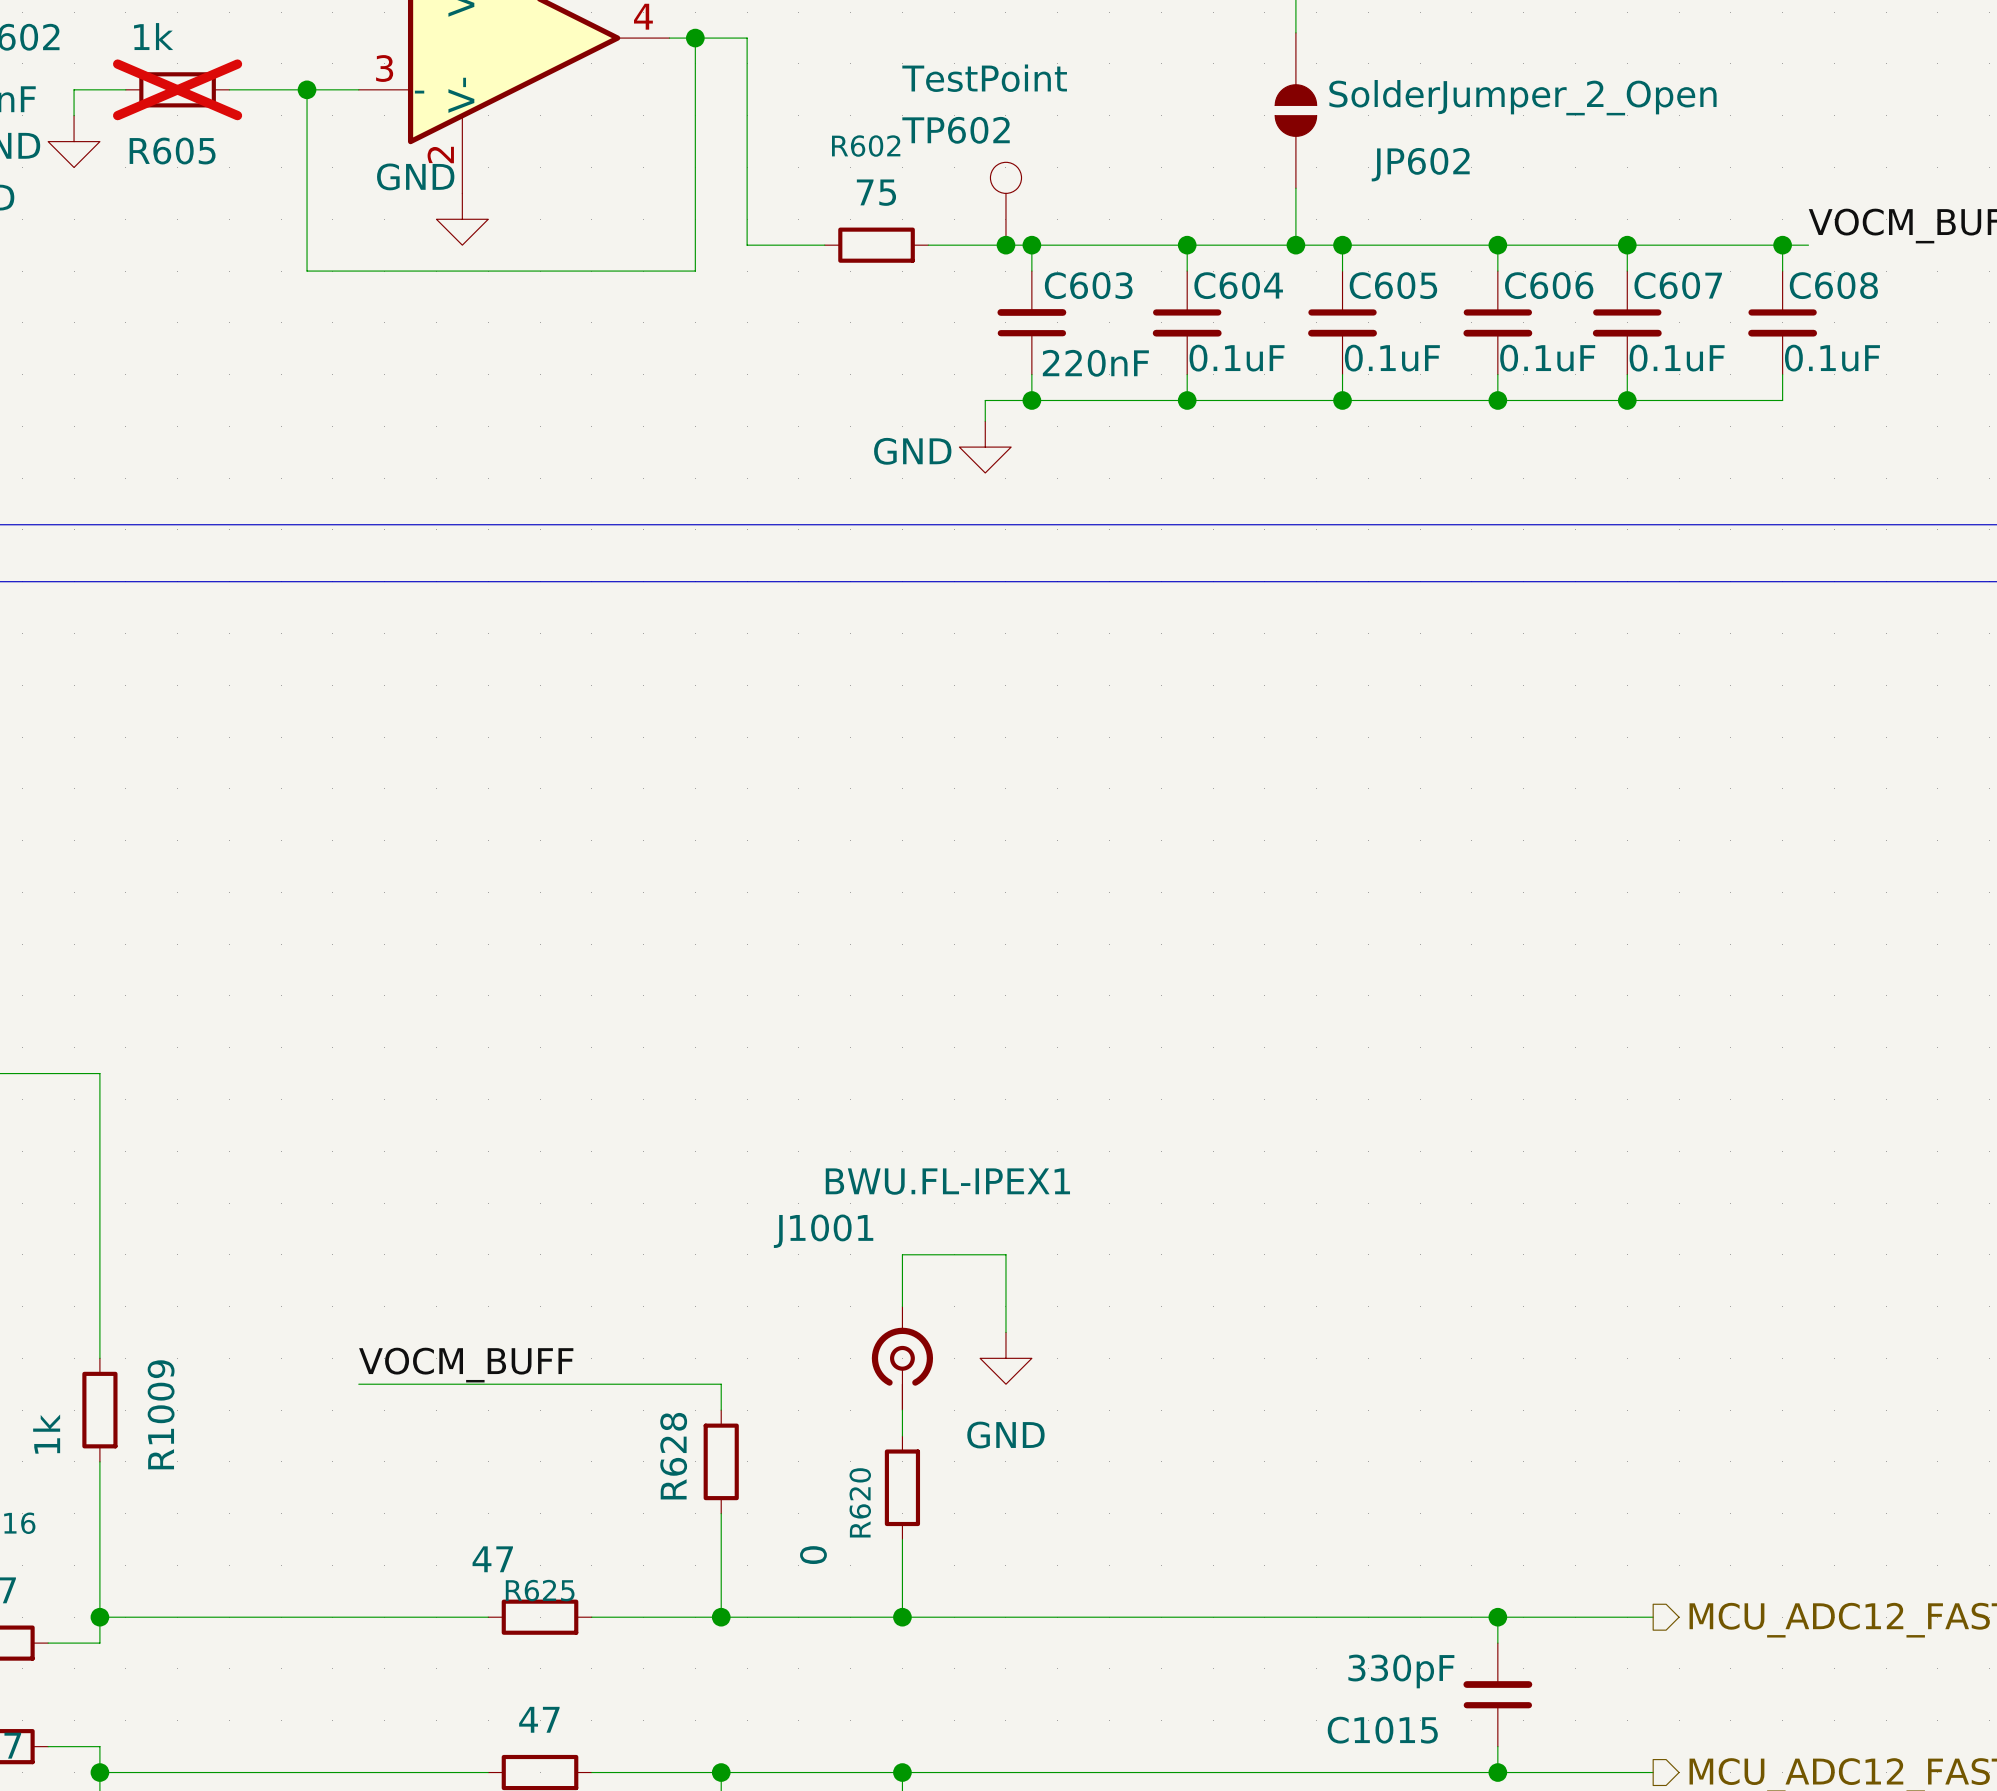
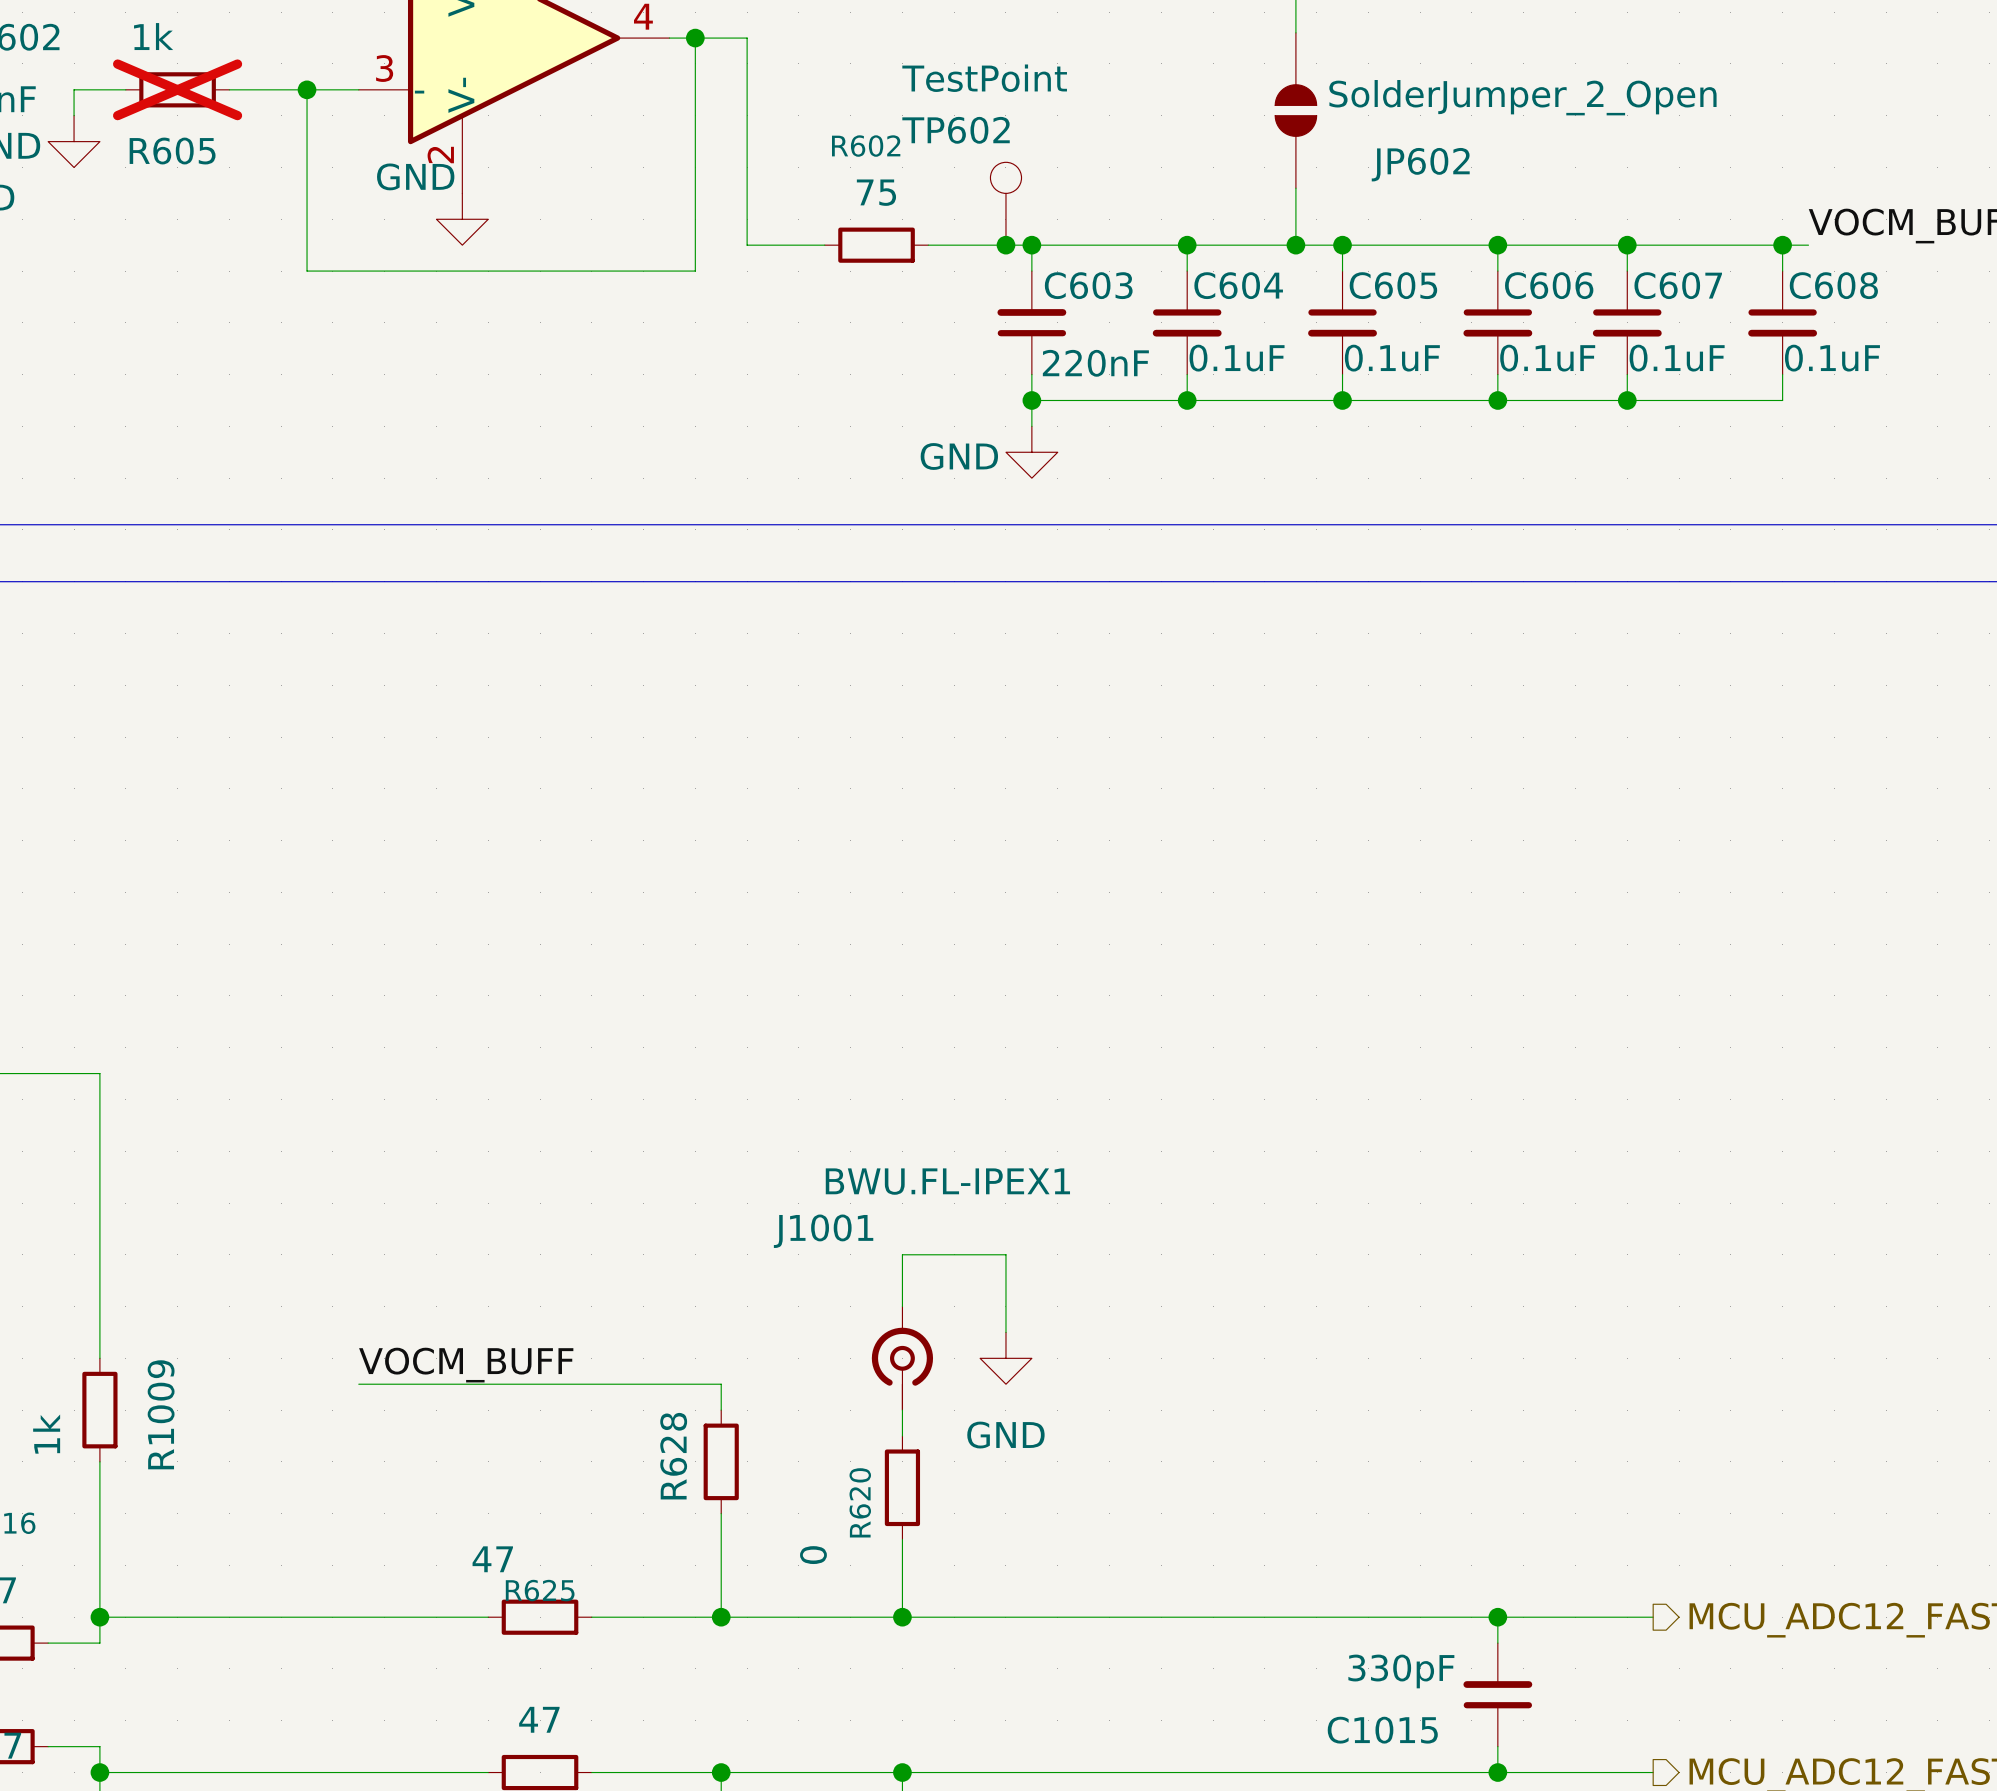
wire: (1031, 400) (985, 400) (985, 421) -> (1031, 400) (1031, 426)
power symbol position: GND (985, 447) -> GND (1031, 452)

